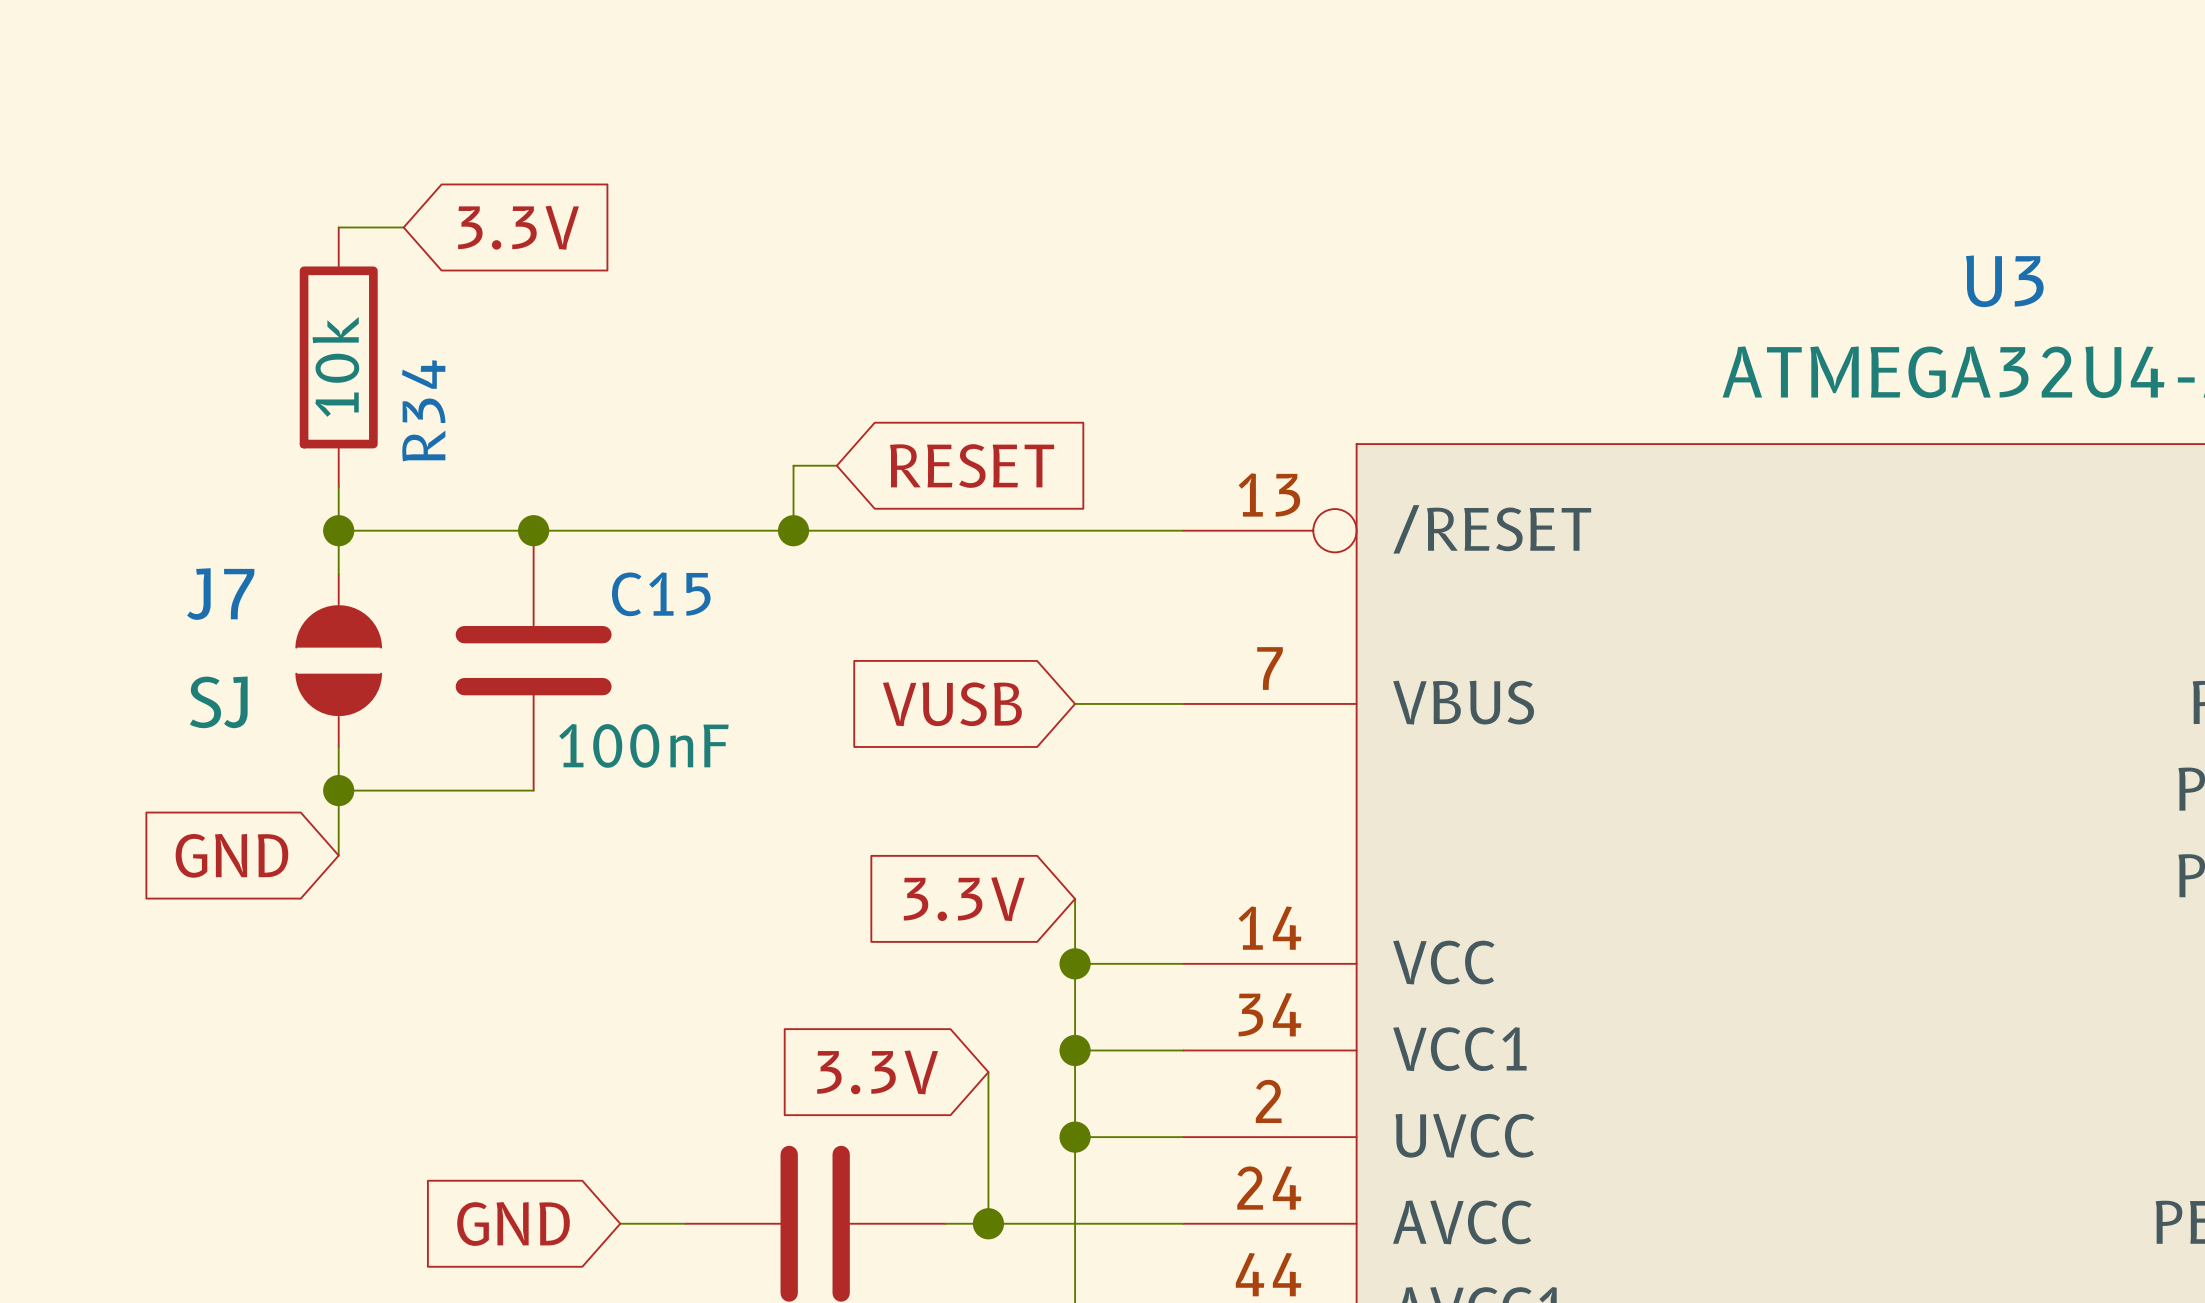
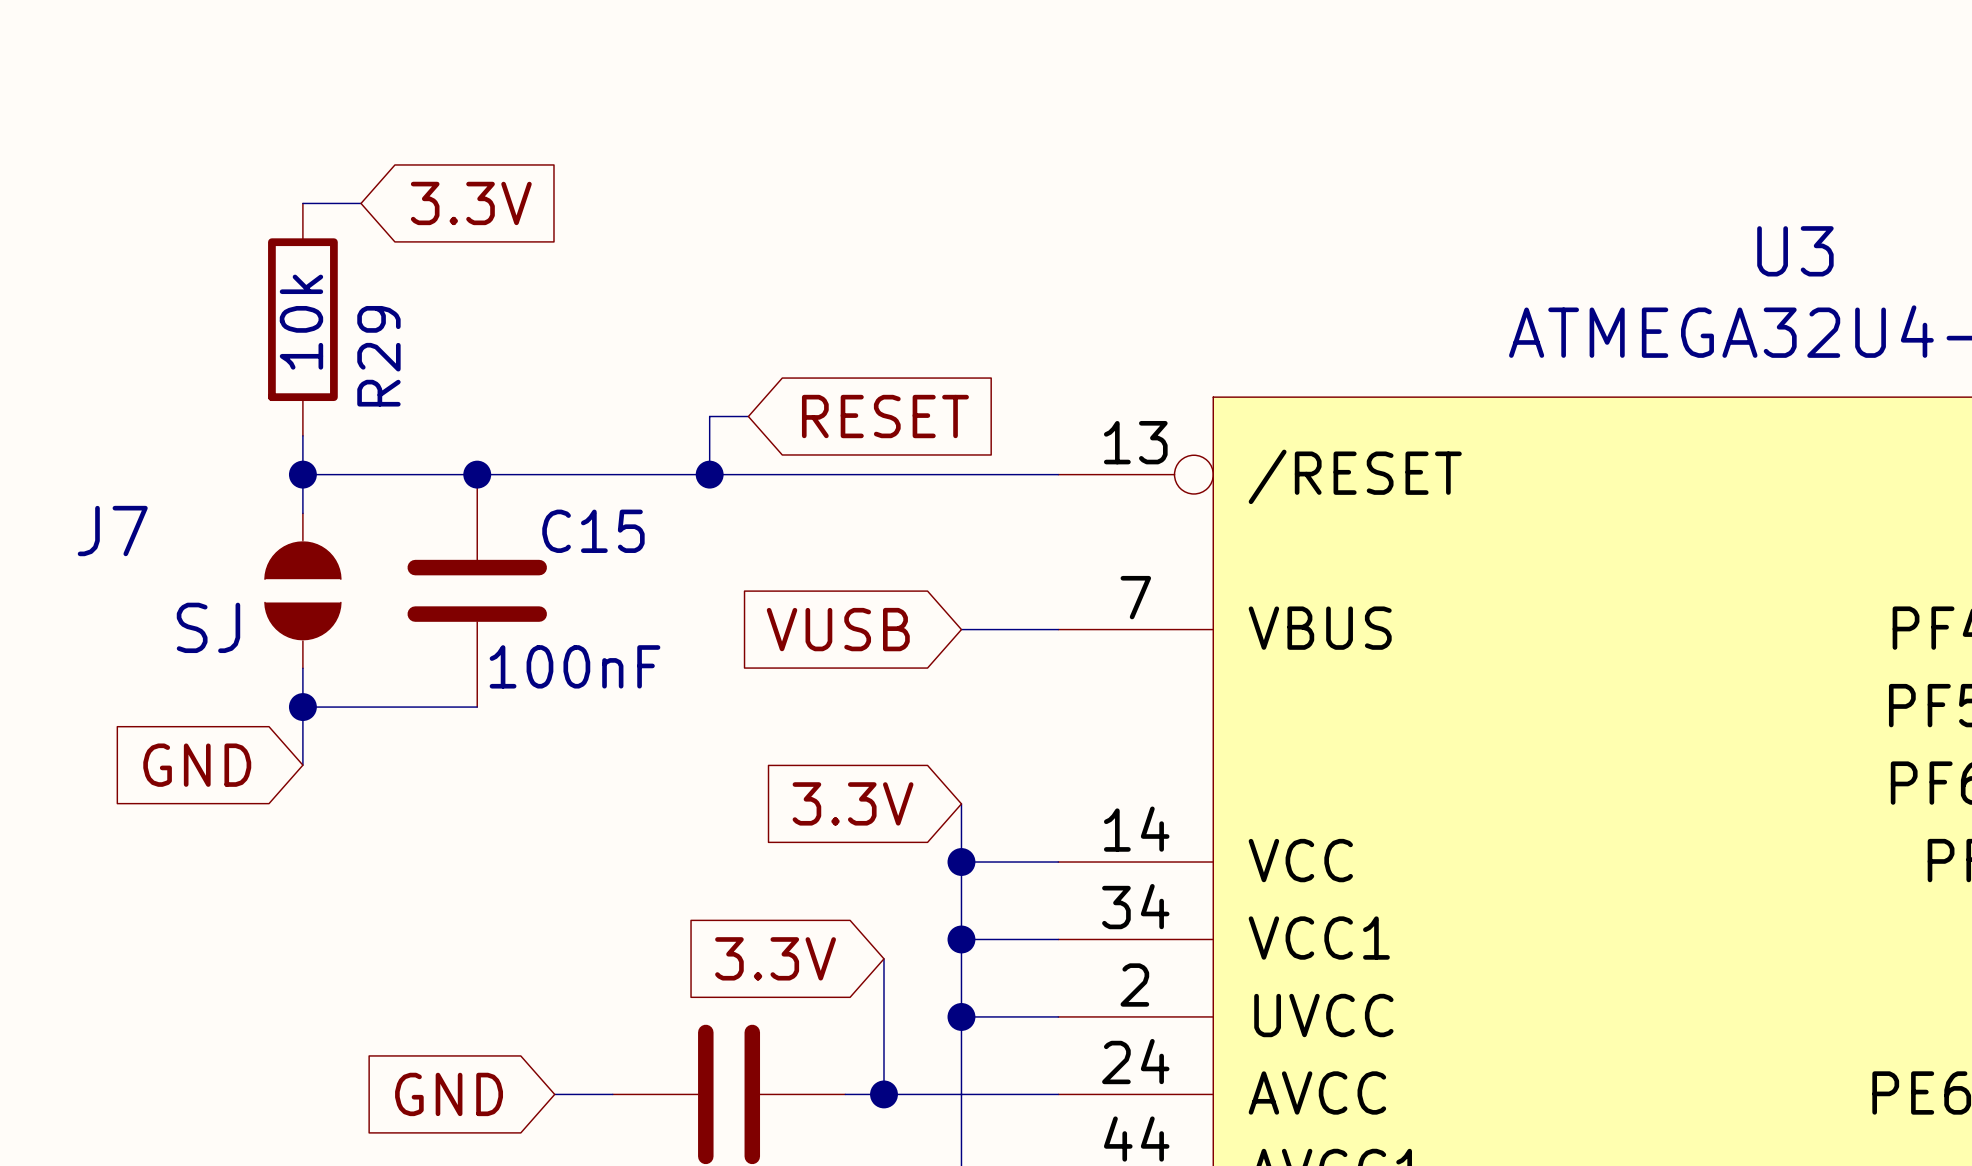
R34 name: R34 (423, 410) -> R29 (378, 356)
J7 name position: J7 (220, 594) -> J7 (112, 531)

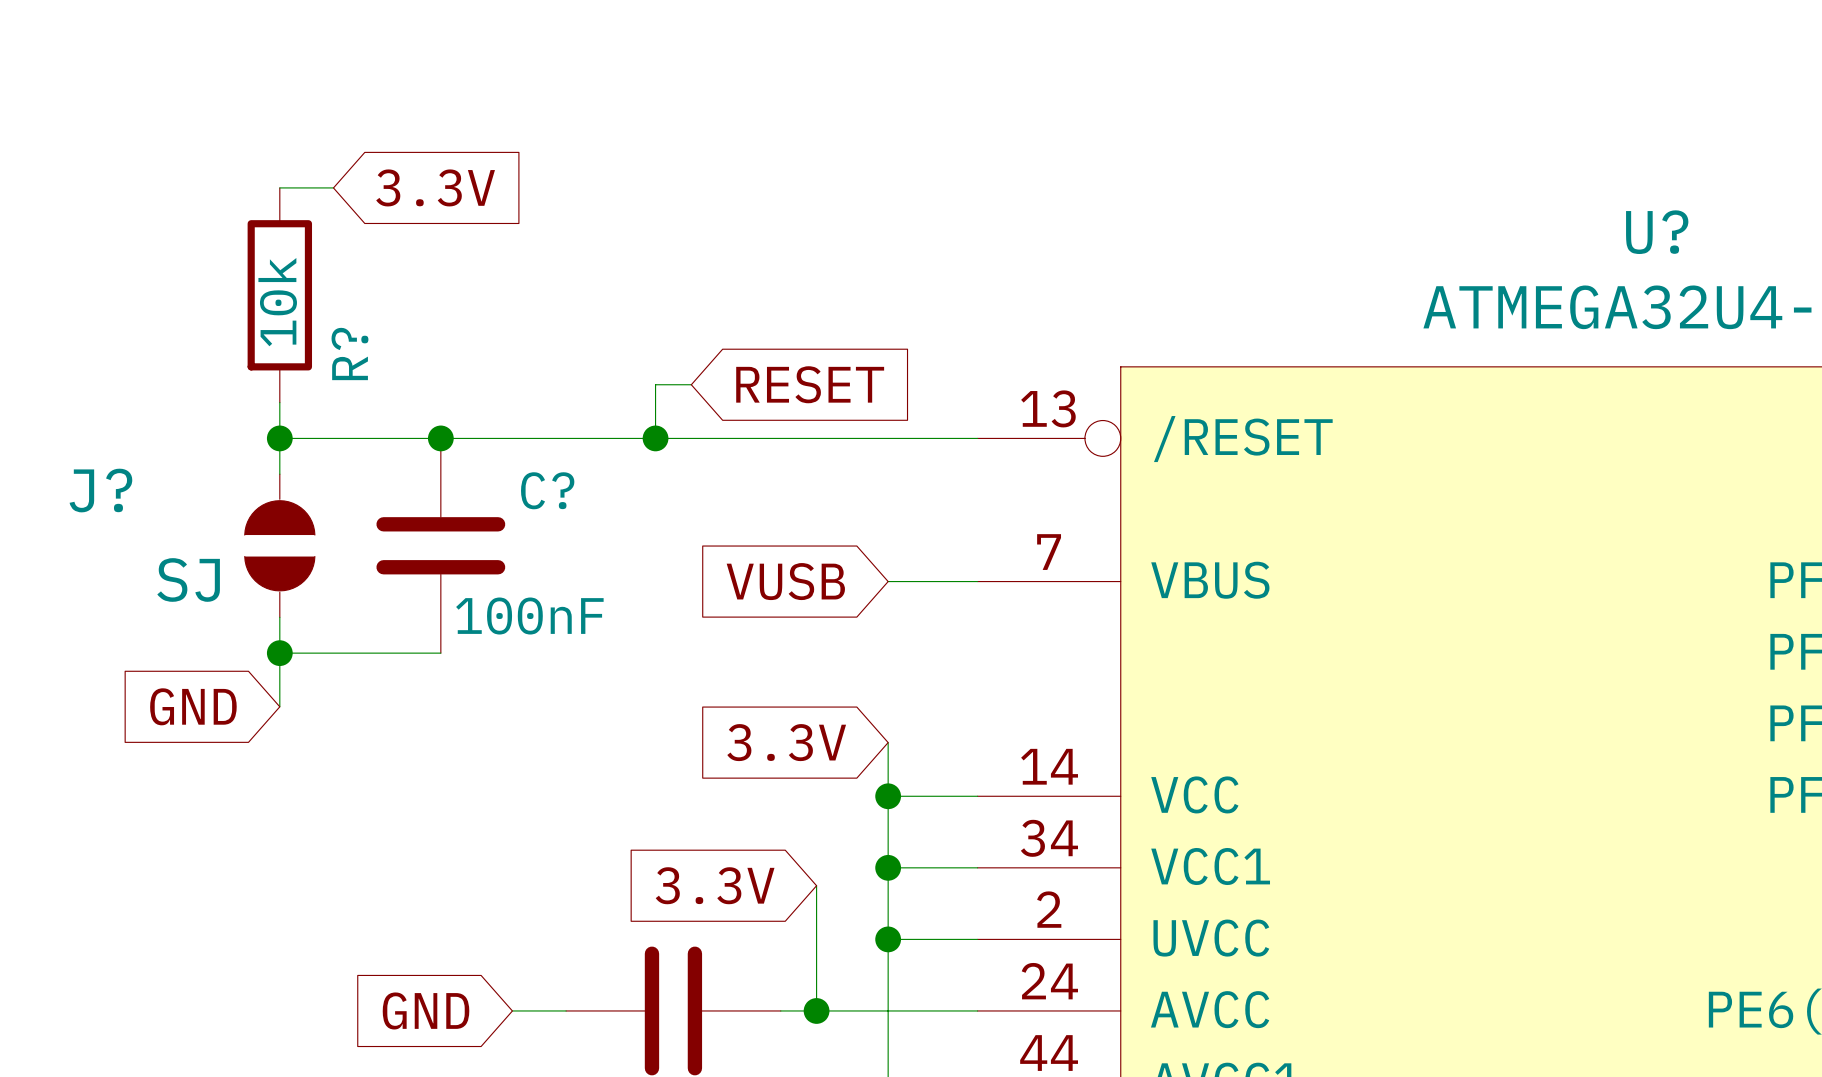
U3 name: U3 (1795, 251) -> U? (1657, 232)
R29 name: R29 (378, 356) -> R? (349, 353)
J7 name: J7 (112, 531) -> J? (100, 490)
C15 name: C15 (593, 531) -> C? (547, 490)

